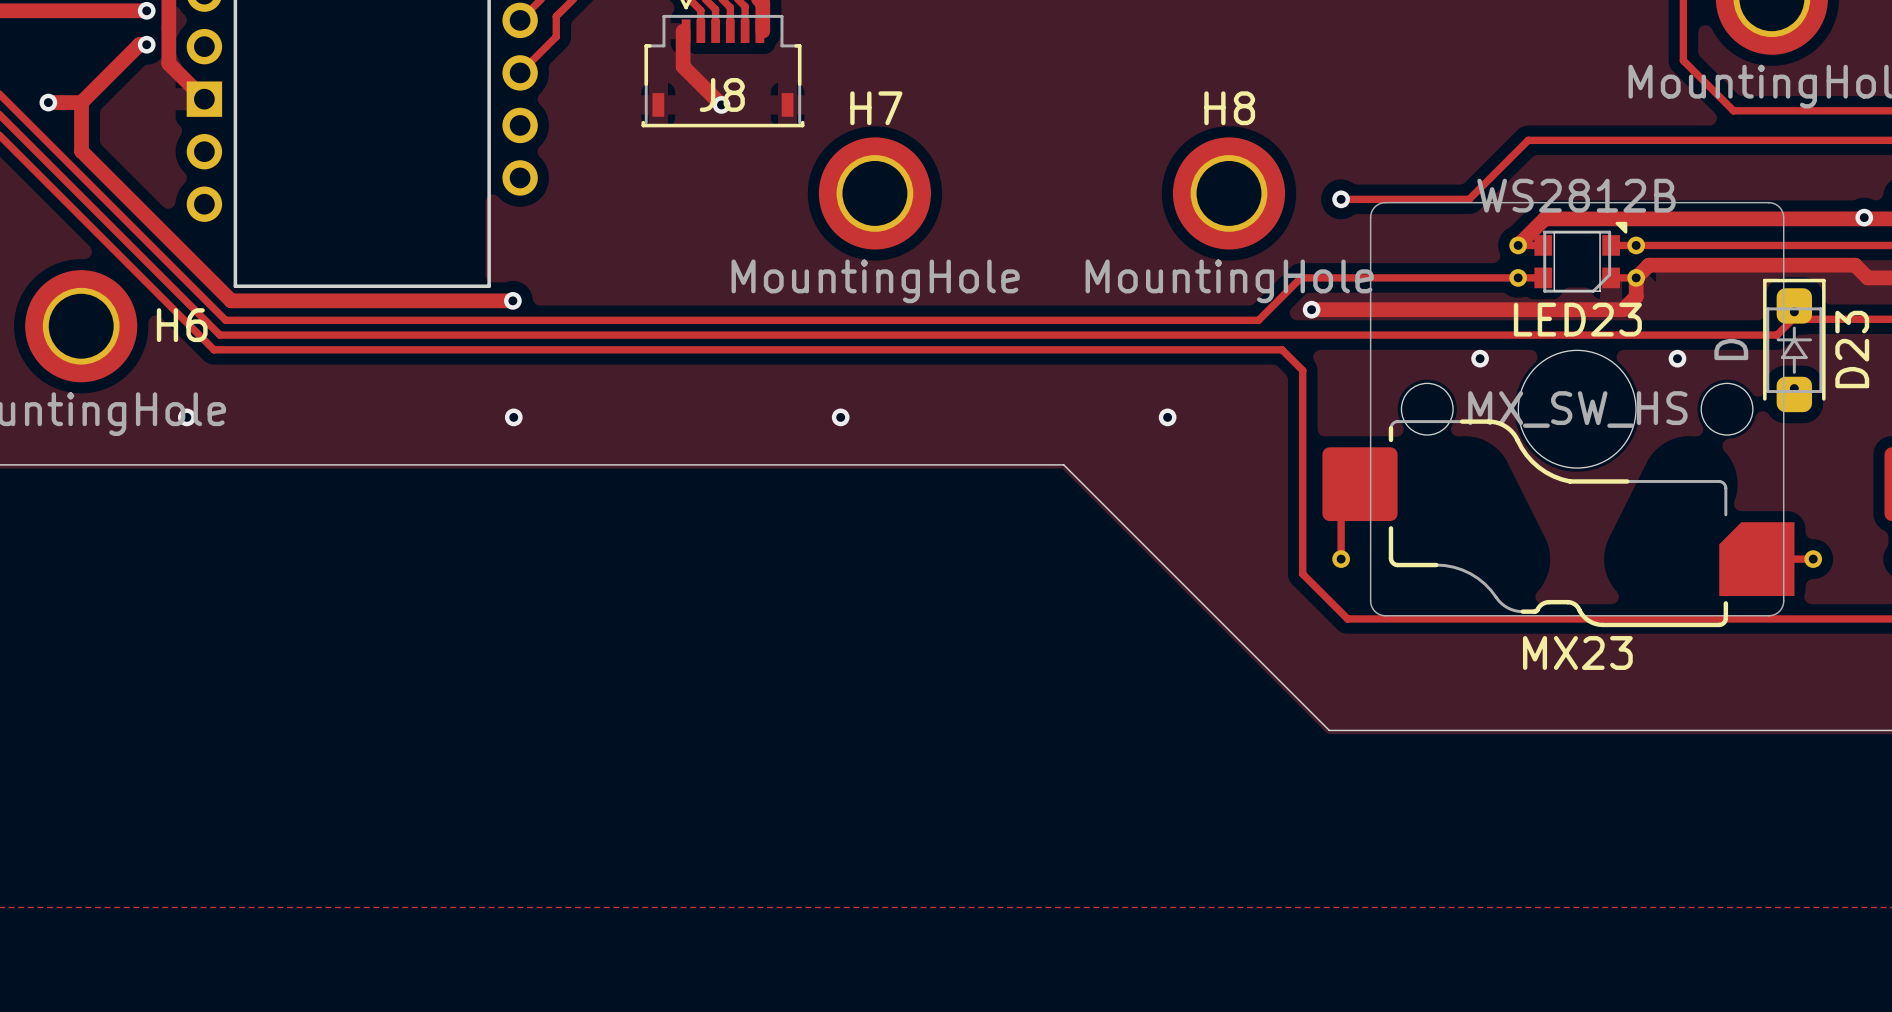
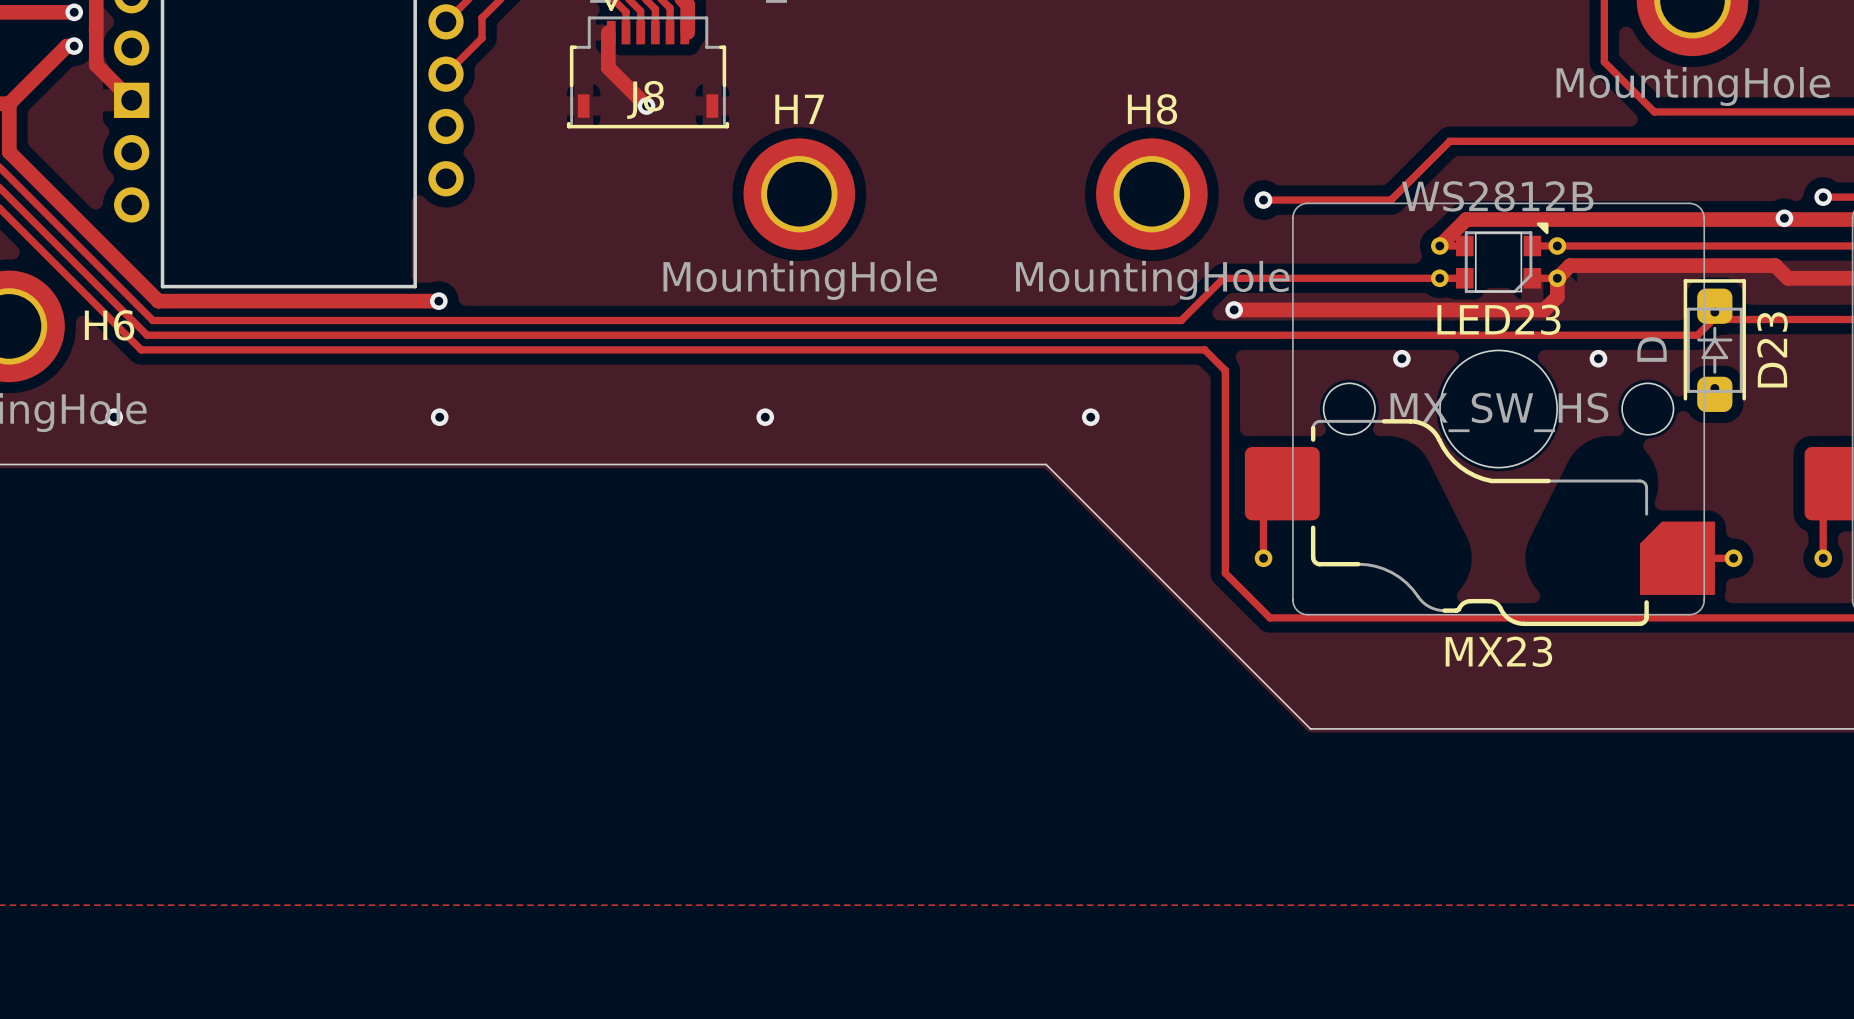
board edge: (1063, 464) (1329, 730) (1388, 730) -> (987, 464) (1046, 464) (1310, 728)

